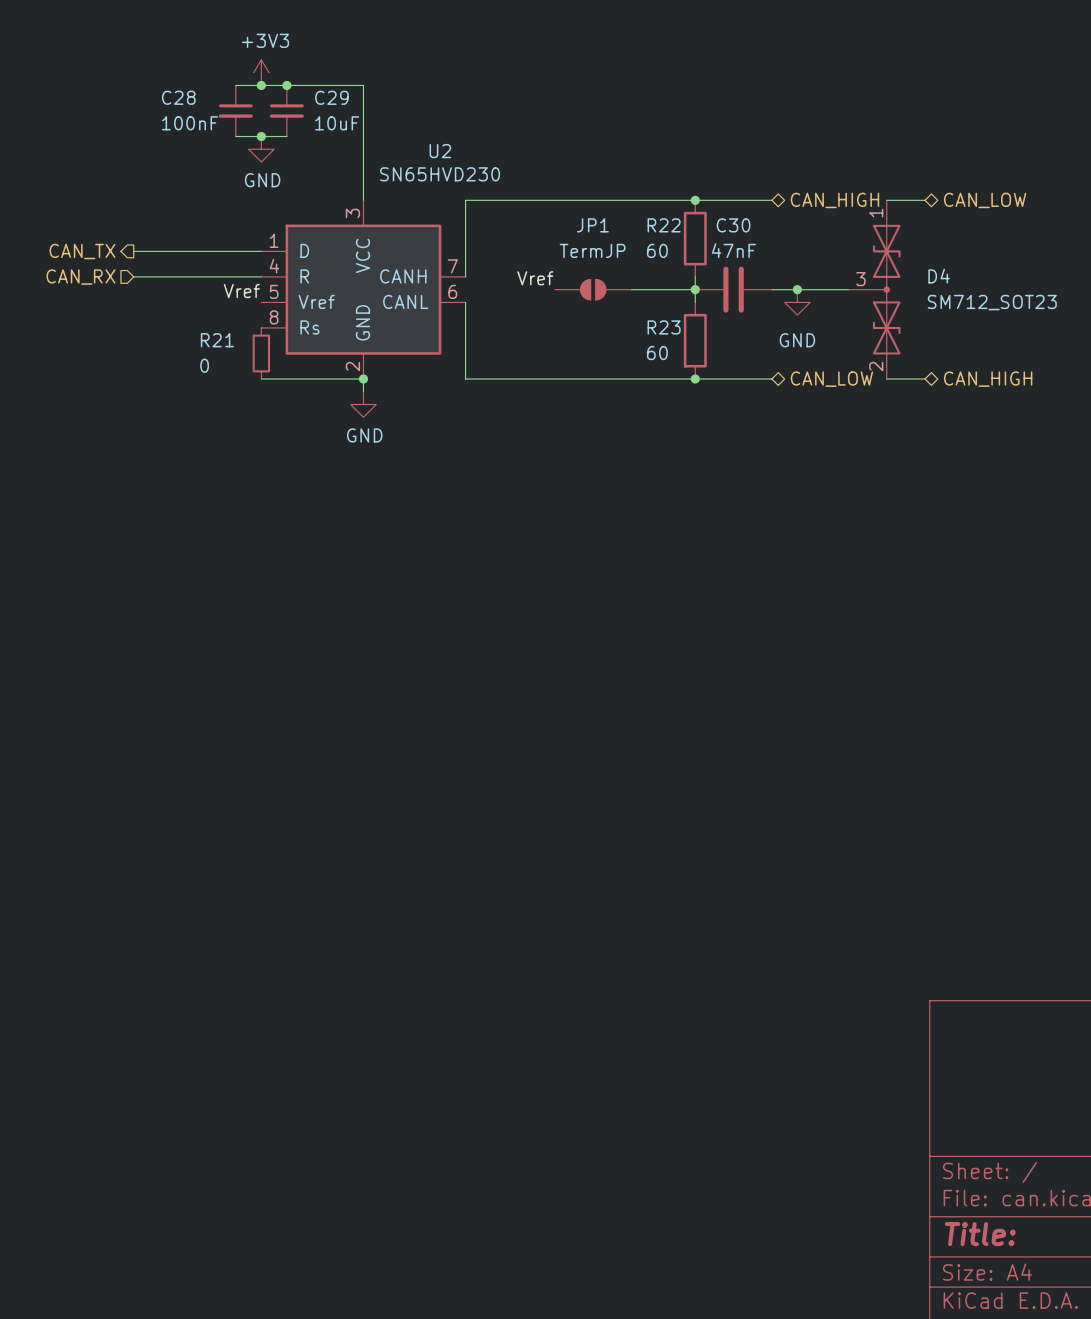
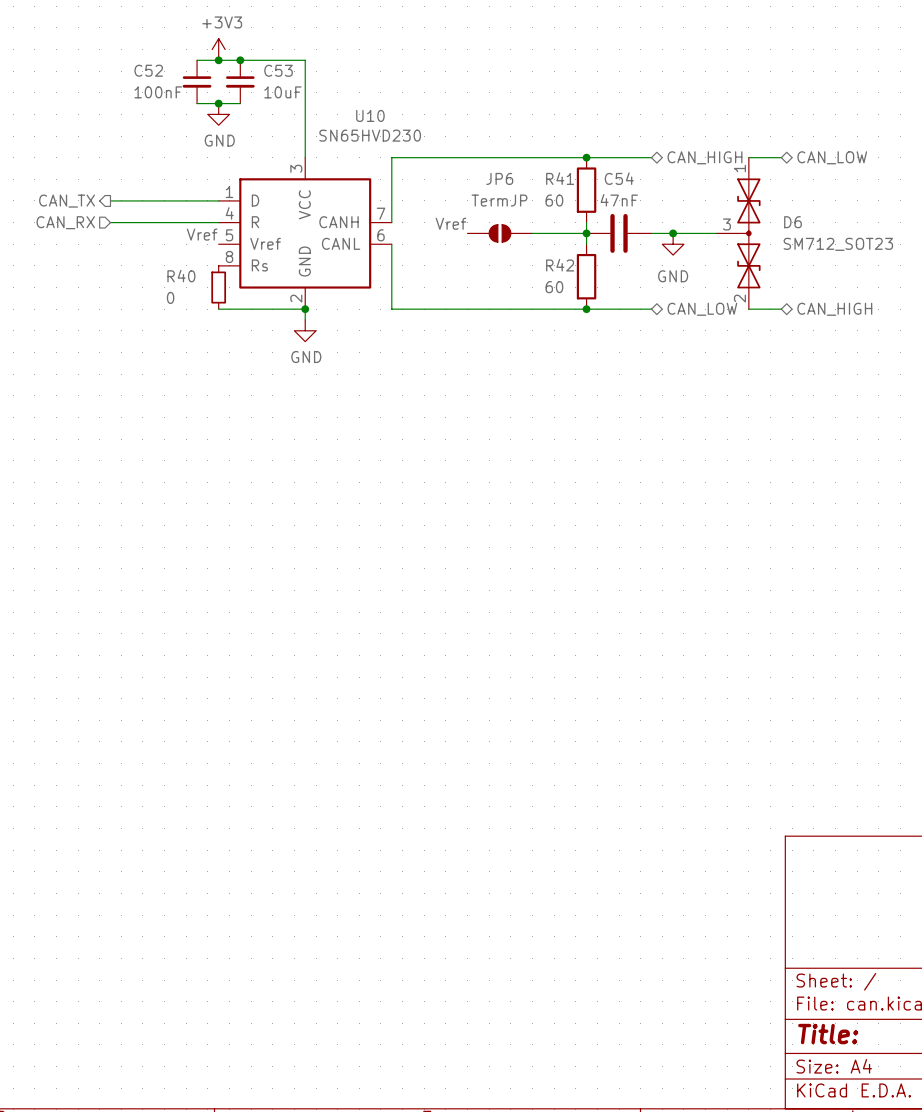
C28 name: C28 (178, 97) -> C52 (148, 70)
C29 name: C29 (331, 97) -> C53 (278, 70)
U2 name: U2 (440, 151) -> U10 (370, 115)
JP1 name: JP1 (592, 225) -> JP6 (499, 178)
R22 name: R22 (664, 225) -> R41 (560, 178)
C30 name: C30 (733, 225) -> C54 (619, 178)
D4 name: D4 (939, 276) -> D6 (792, 222)
R23 name: R23 (664, 327) -> R42 (560, 265)
R21 name: R21 (217, 340) -> R40 (181, 276)

